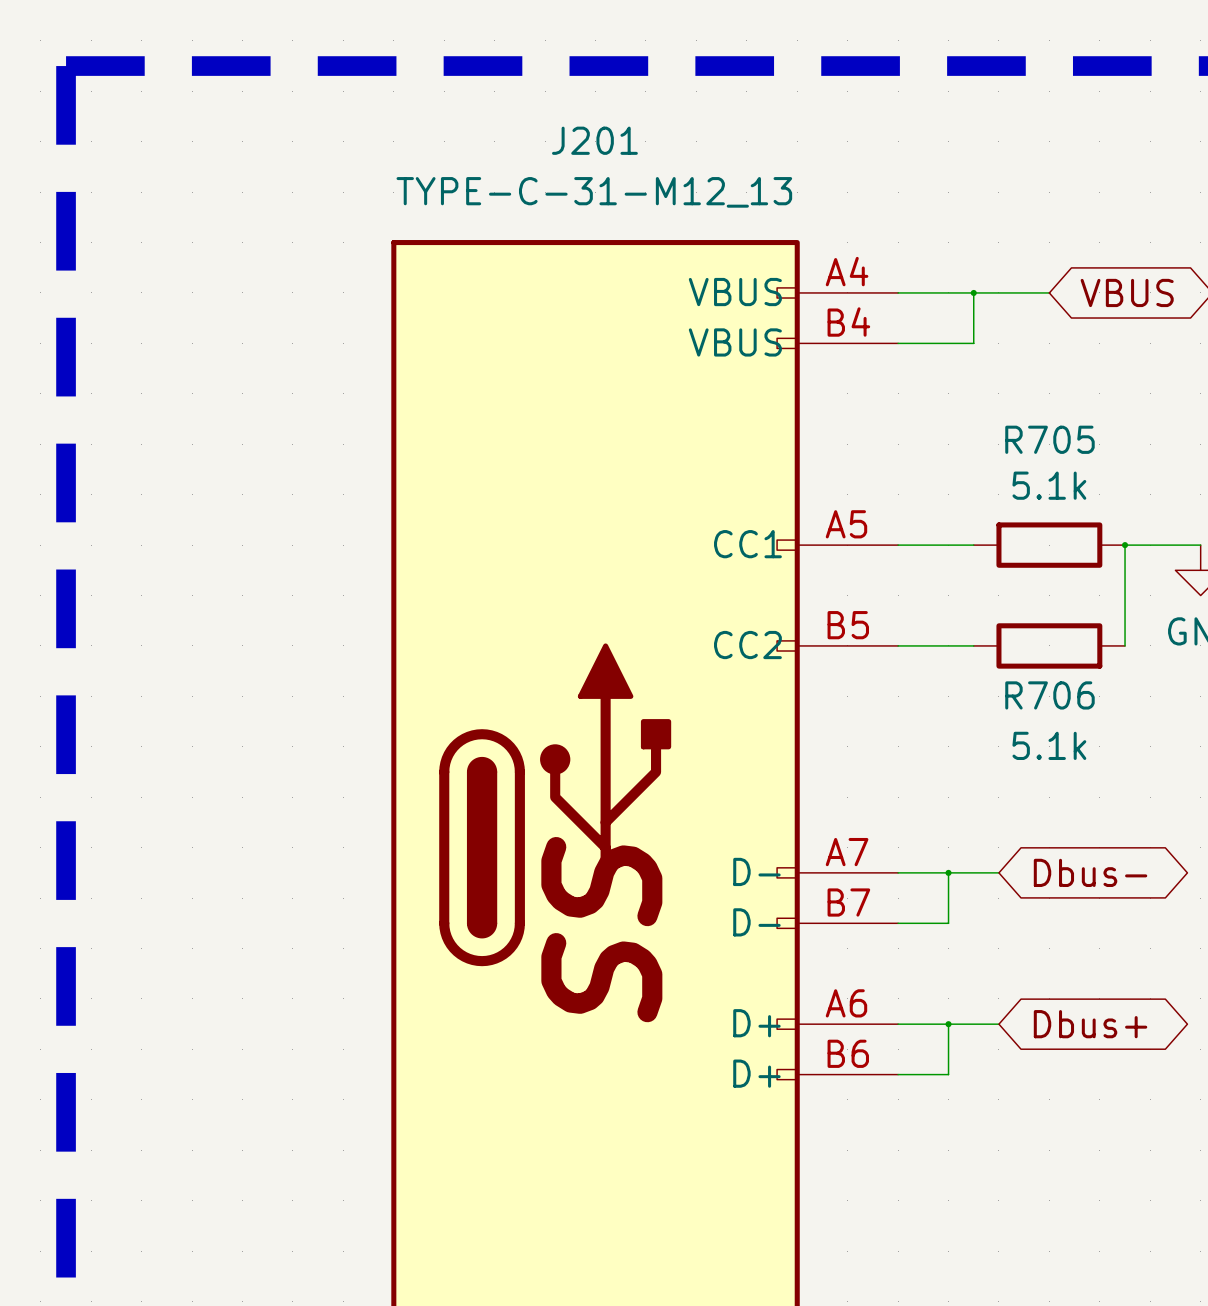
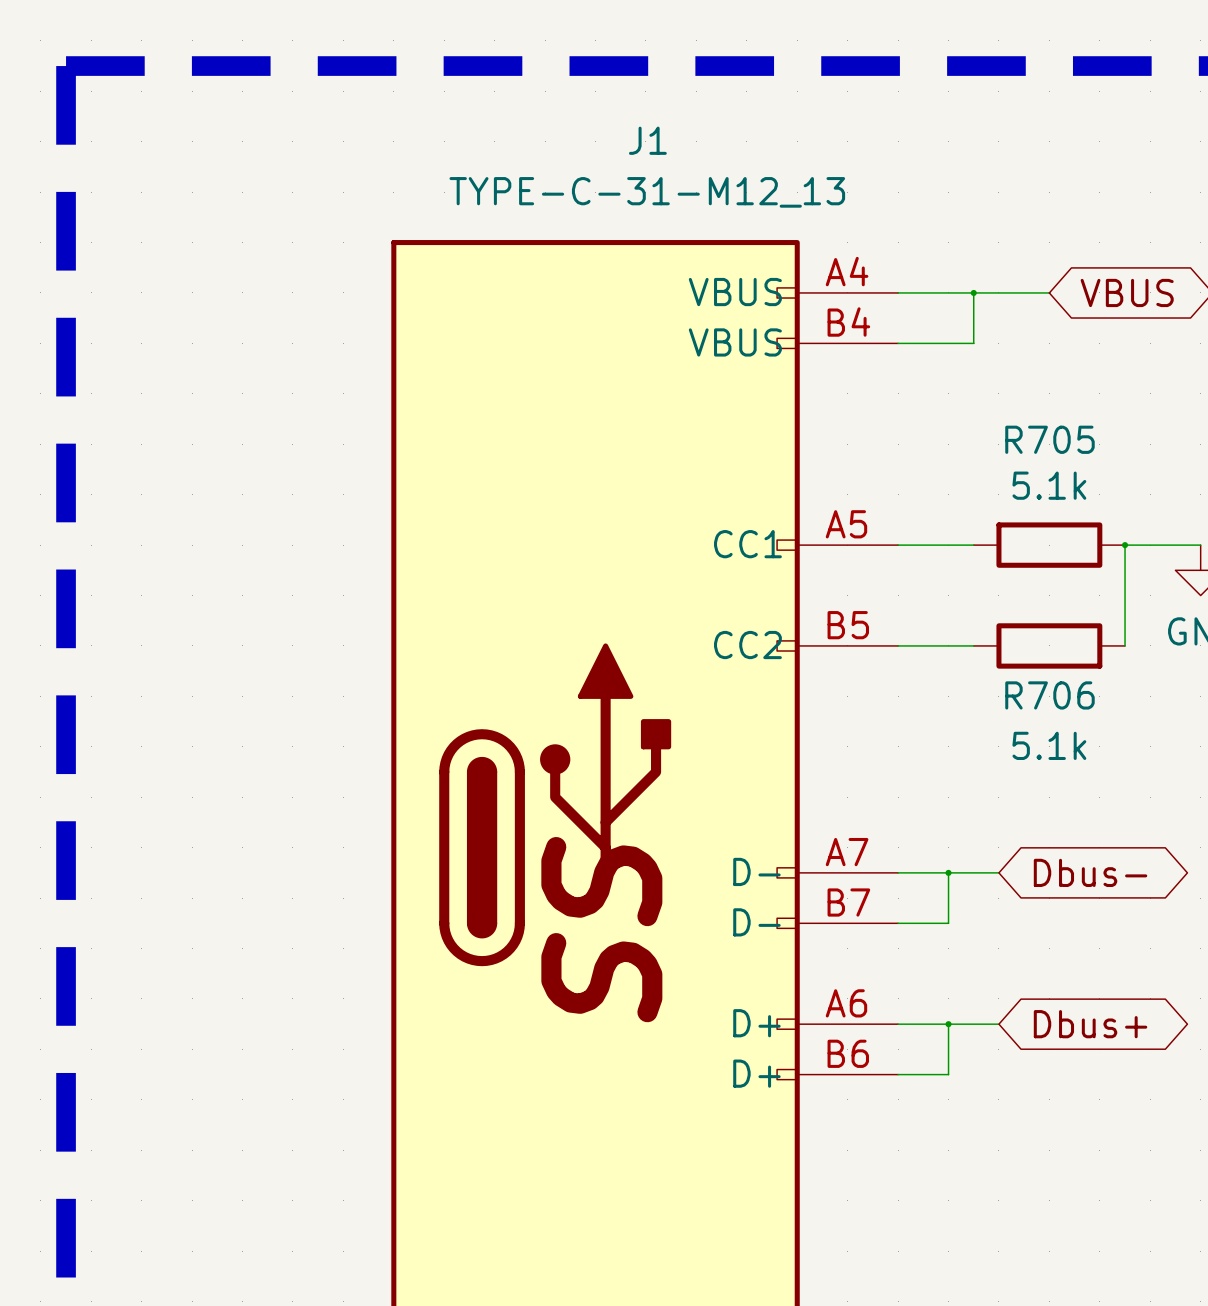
J201 name: J201 (594, 140) -> J1 (647, 140)
J201 value position: TYPE-C-31-M12_13 (594, 192) -> TYPE-C-31-M12_13 (647, 192)

